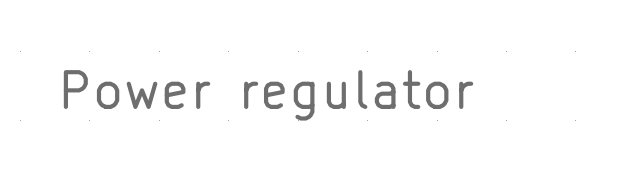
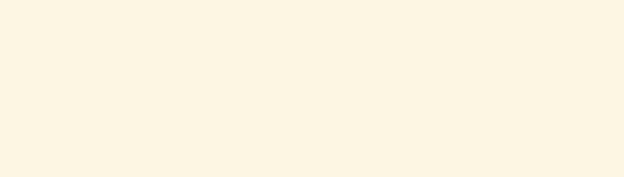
label: Power regulator (268, 95) -> none

